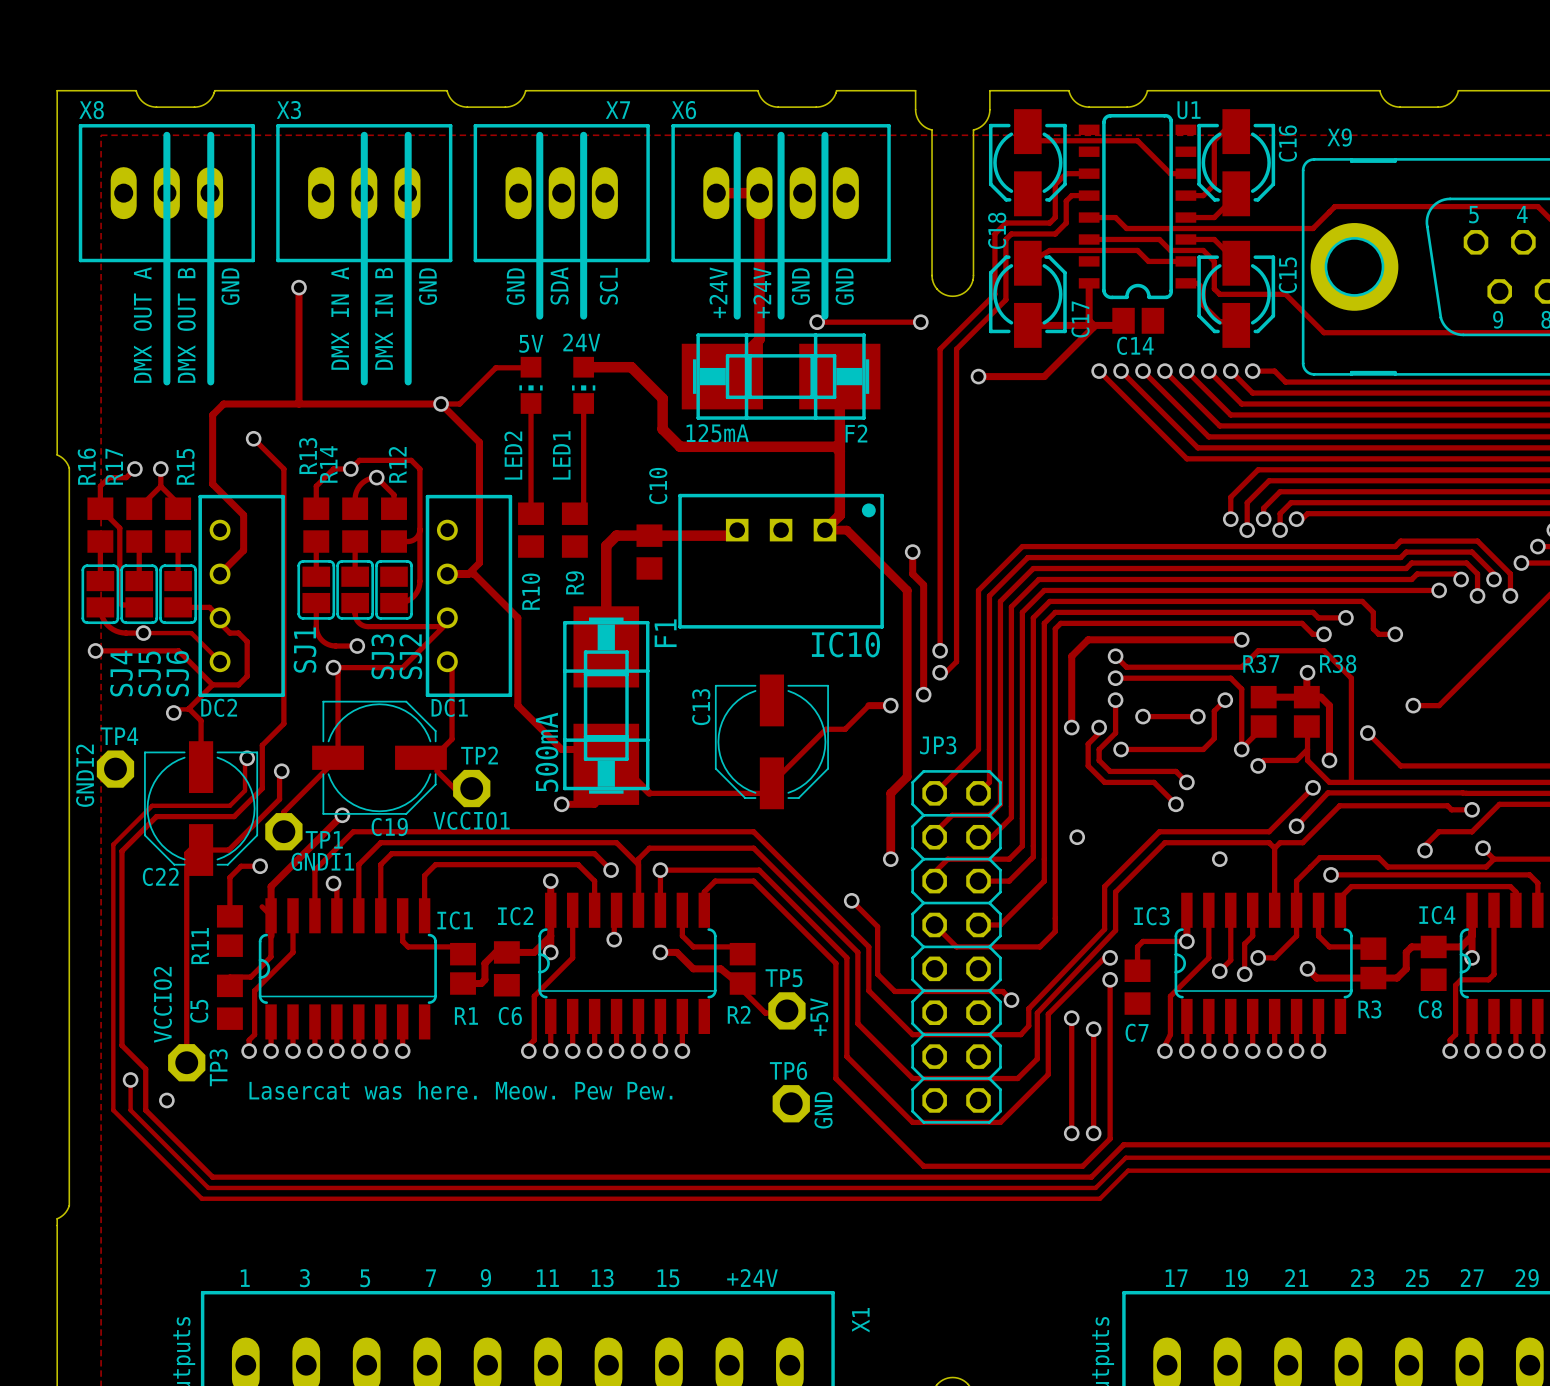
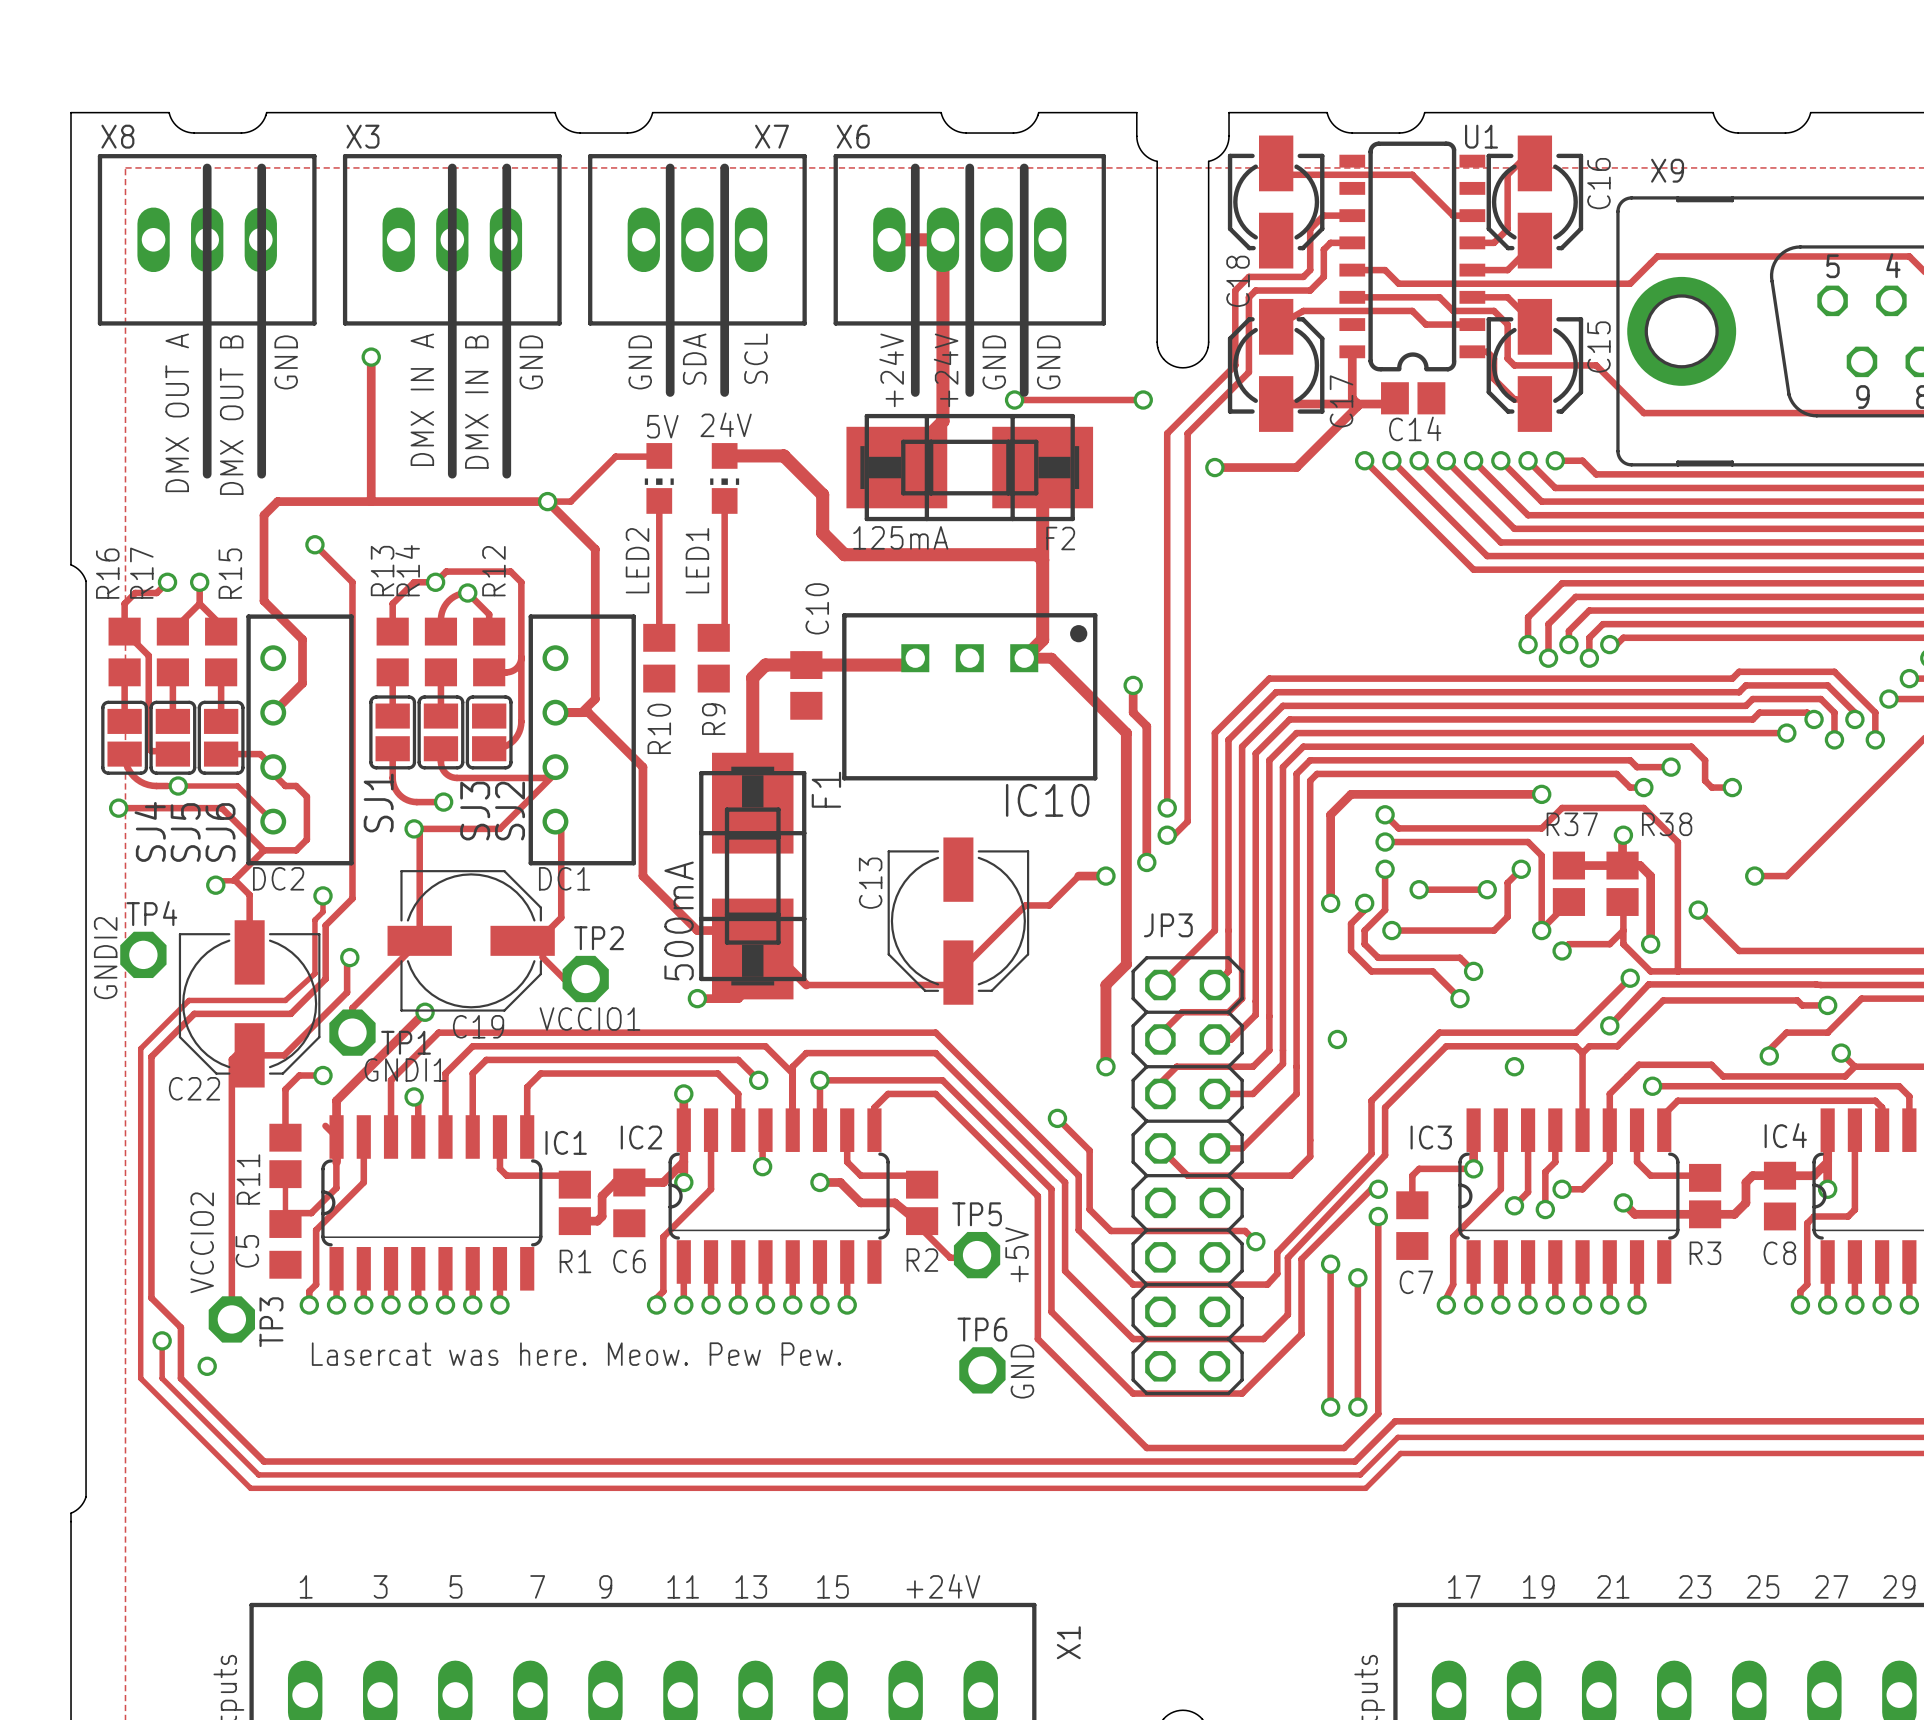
track: (247, 758) (245, 764) (245, 790) (229, 805) -> (322, 895) (322, 911) (314, 920) (314, 973) (285, 1000)
via position: (247, 758) -> (322, 895)
track: none -> (285, 1174) (285, 1213)

